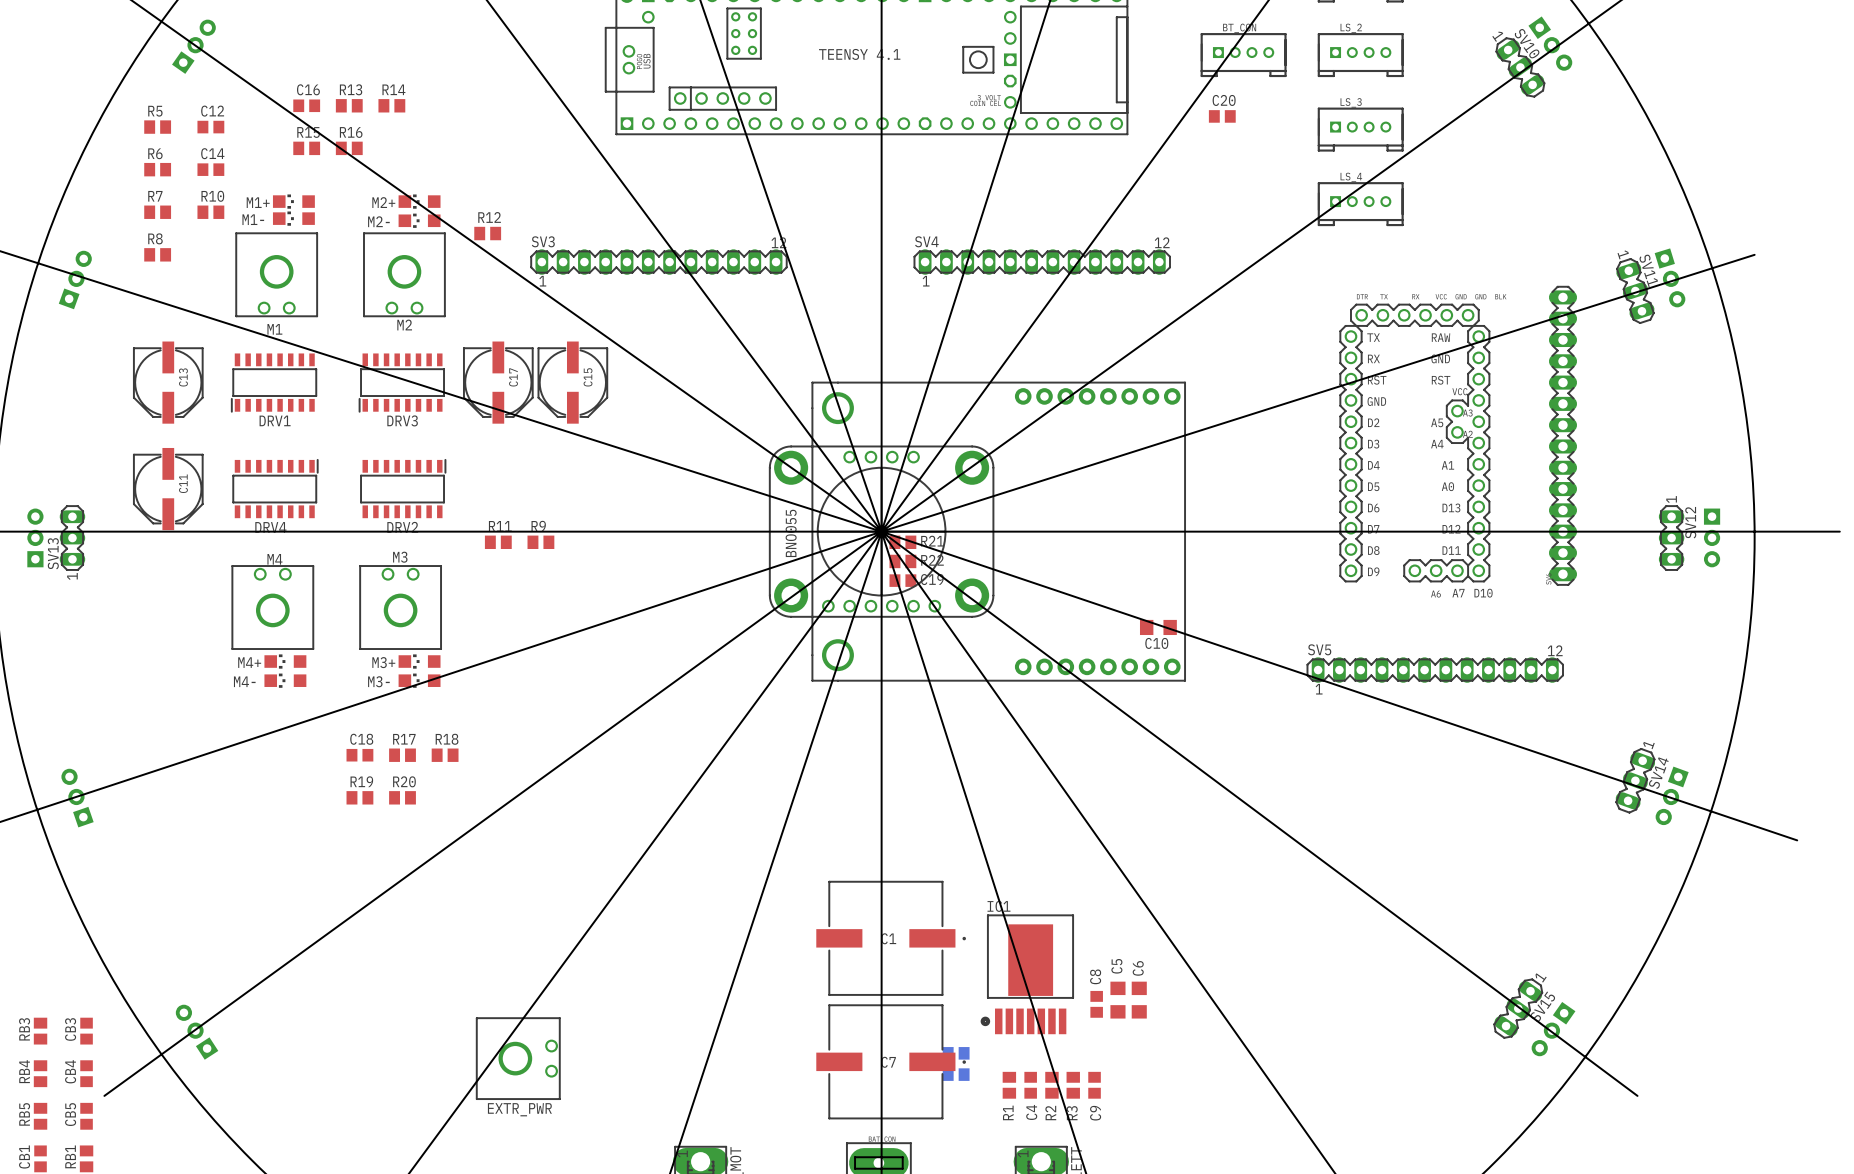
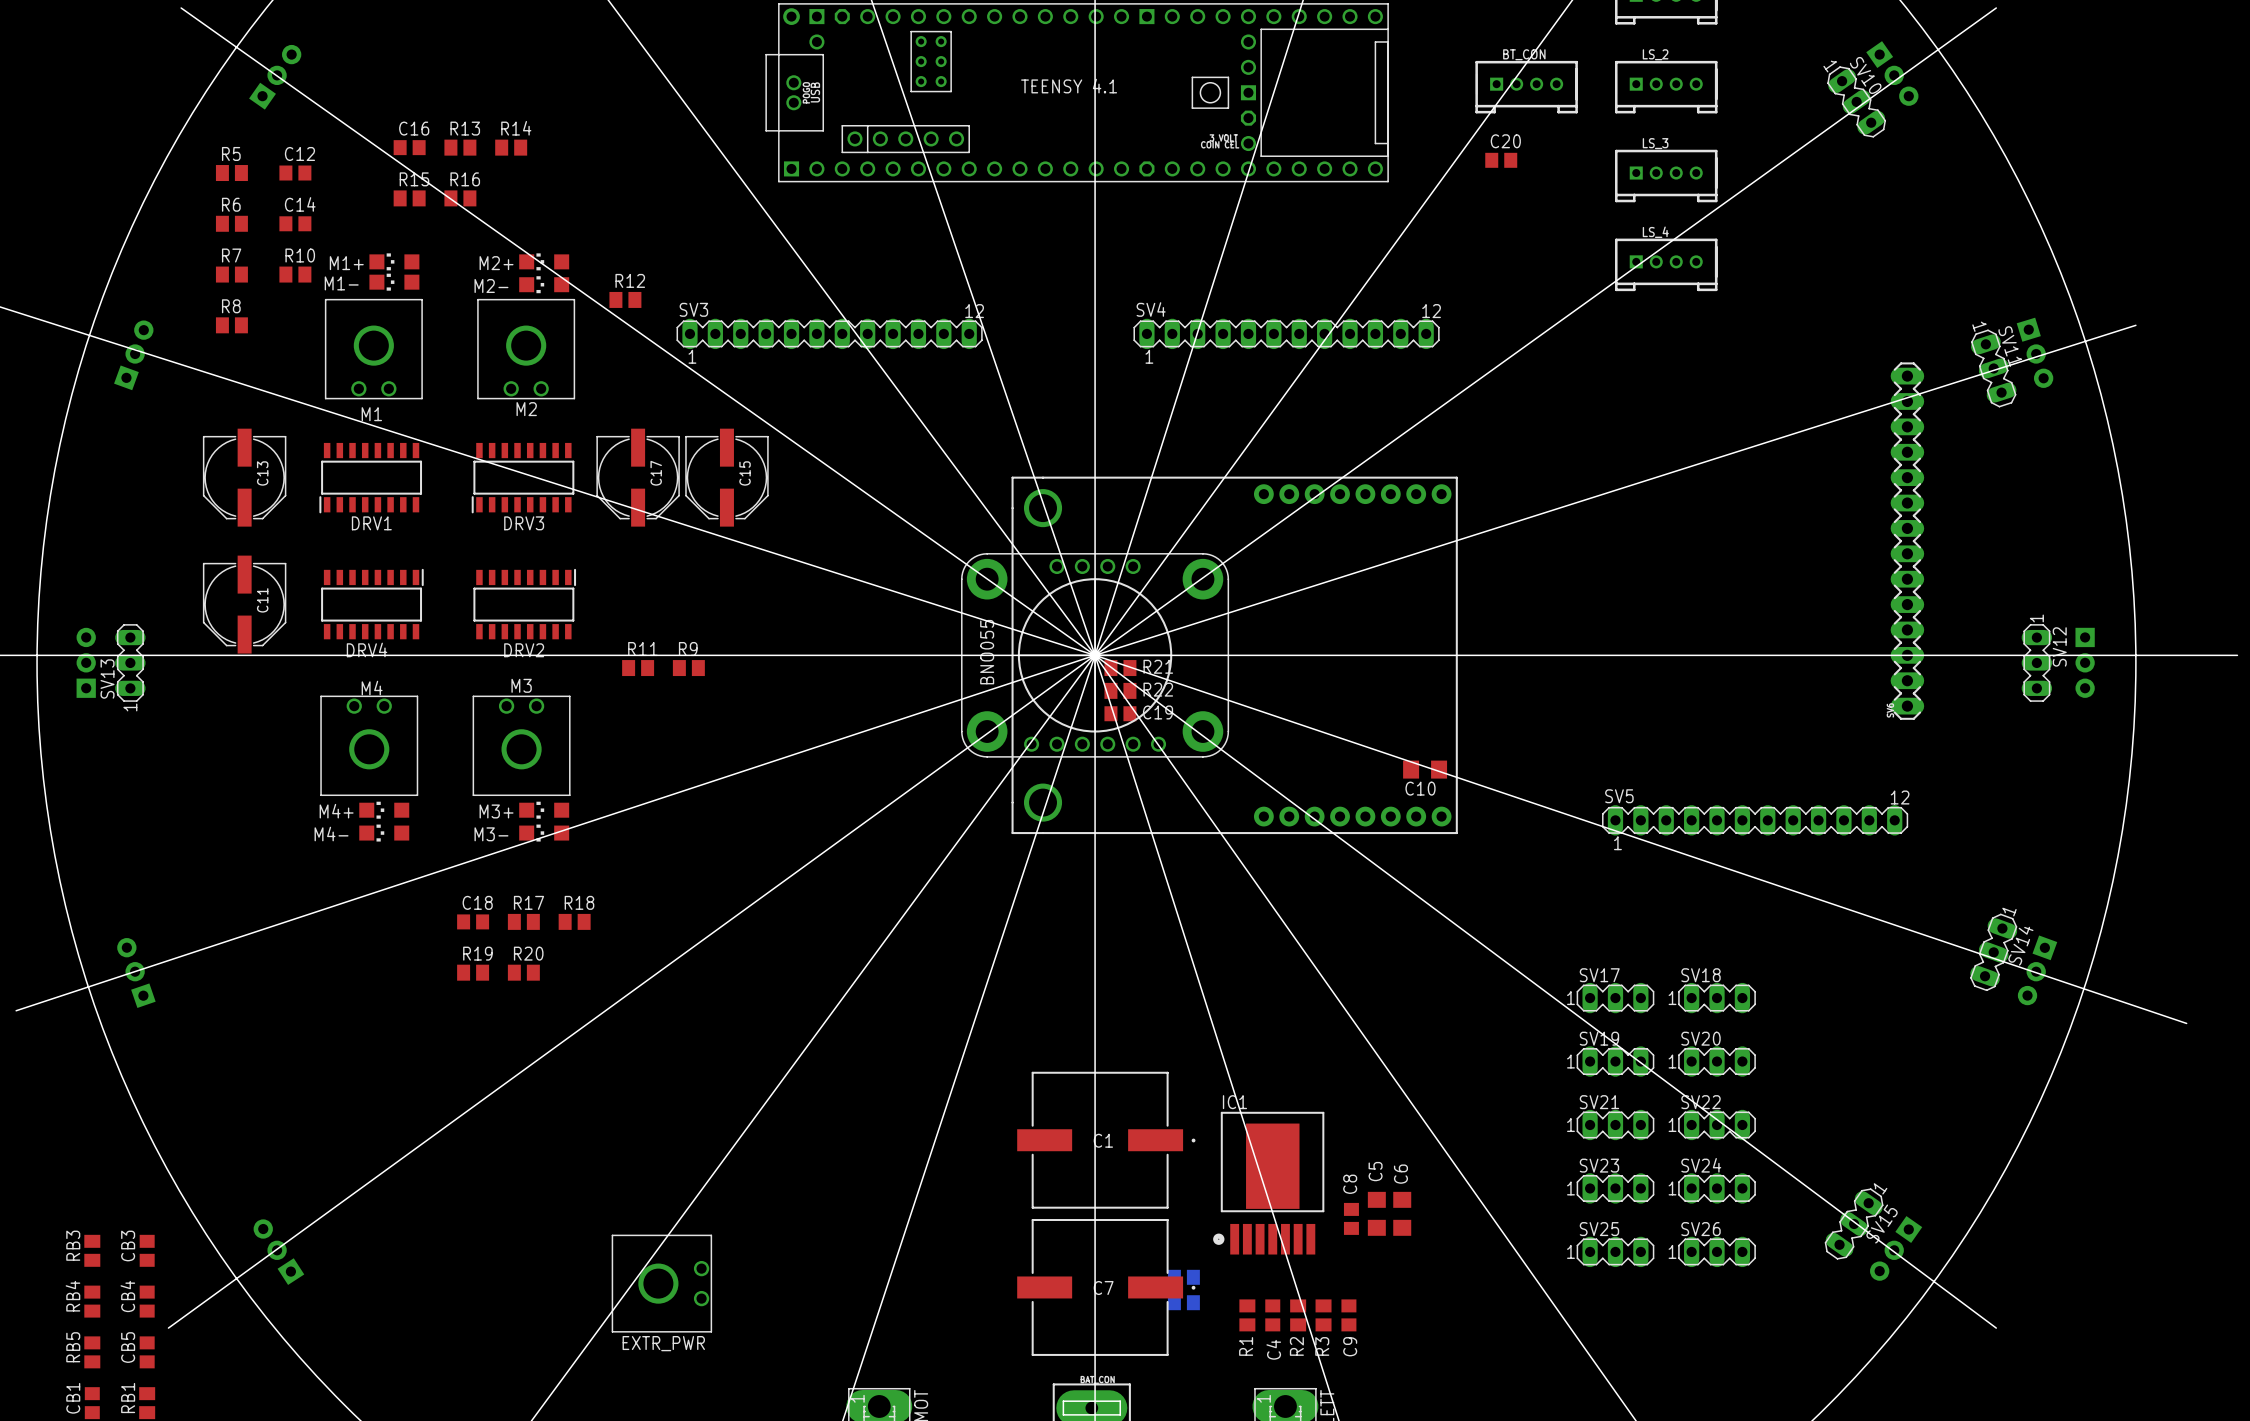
part: (1414, 443) -> none
SV17: none -> (1615, 998)
SV18: none -> (1717, 998)
SV19: none -> (1615, 1061)
SV20: none -> (1717, 1061)
SV21: none -> (1615, 1124)
SV22: none -> (1717, 1124)
SV23: none -> (1615, 1188)
SV24: none -> (1717, 1188)
SV25: none -> (1615, 1251)
SV26: none -> (1717, 1251)

